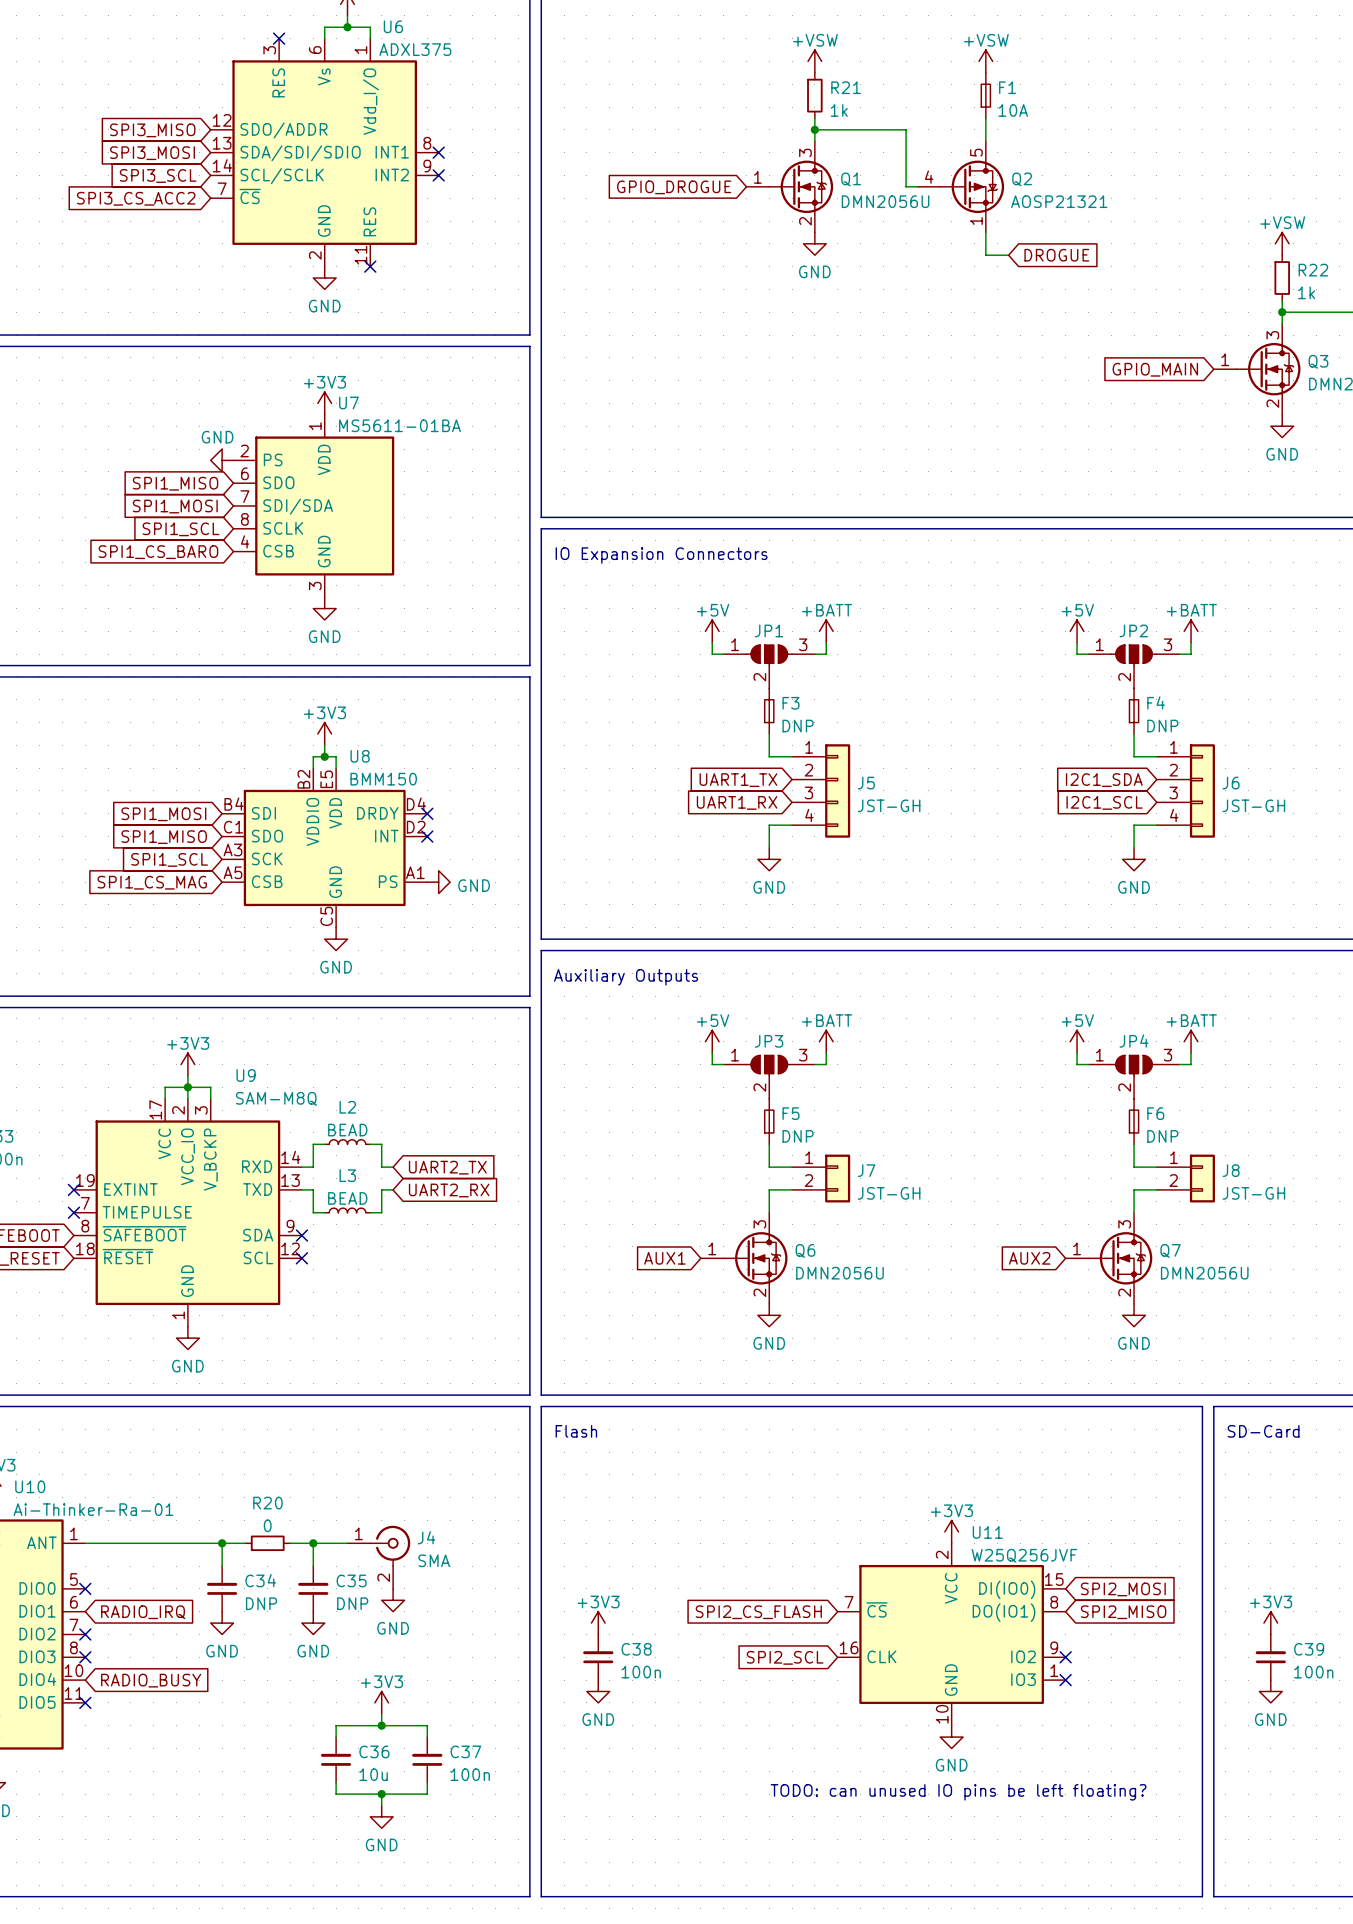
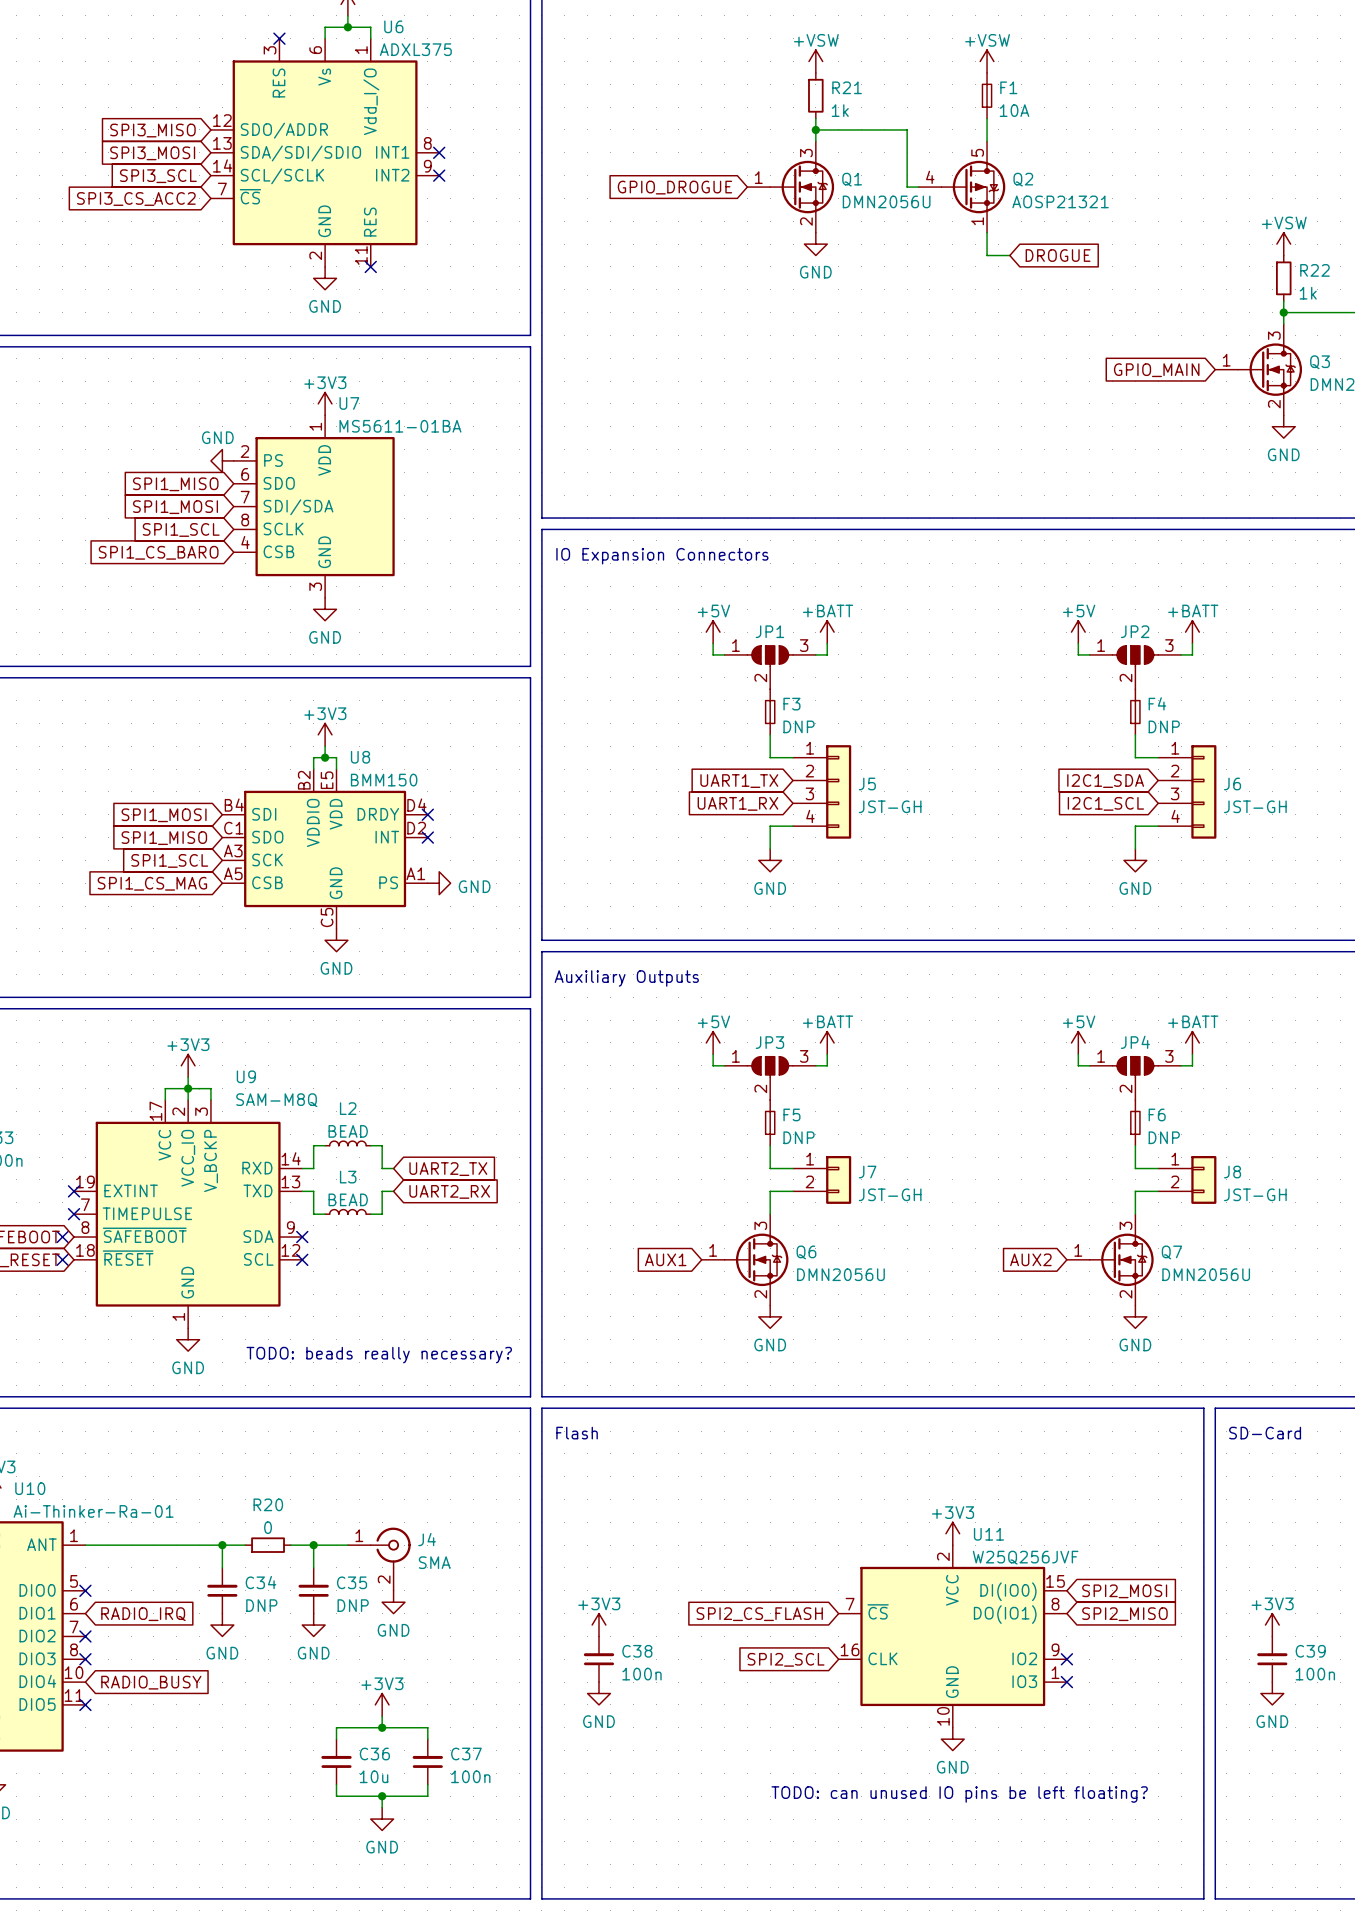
no-connect mark: none -> (62, 1237)
no-connect mark: none -> (62, 1259)
text: none -> TODO: beads really necessary? (379, 1355)

